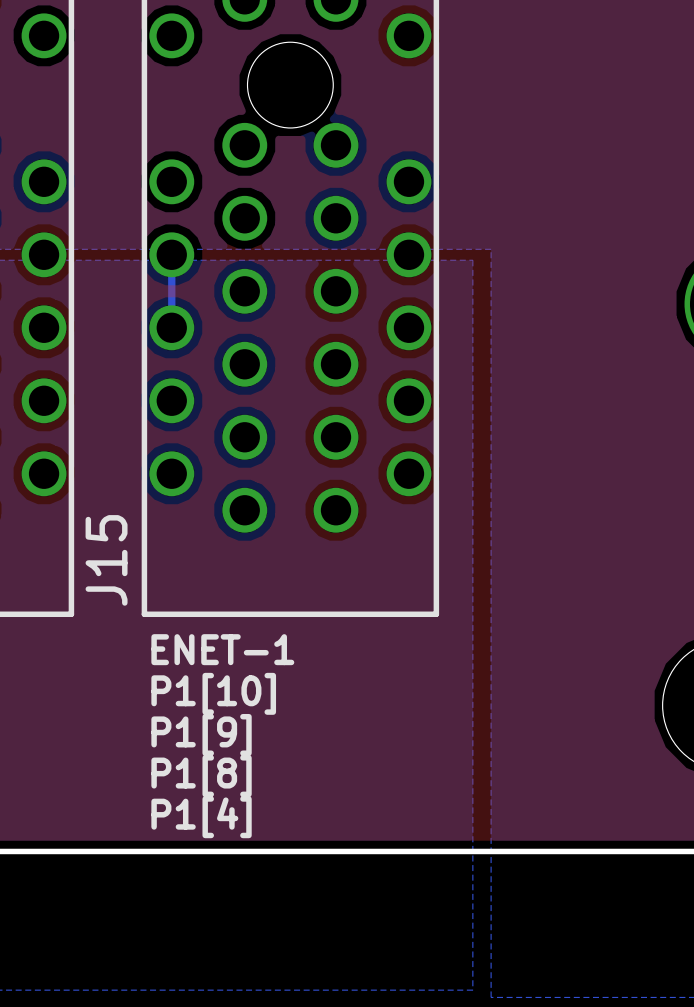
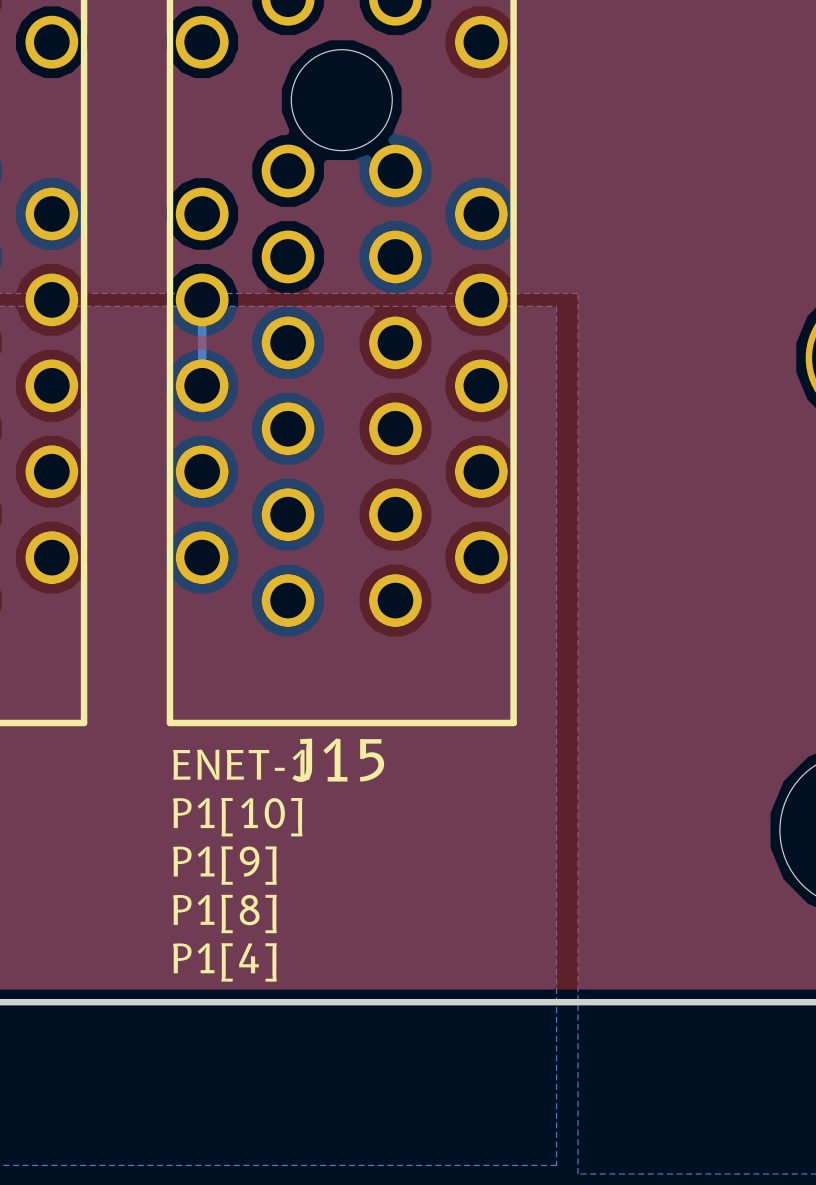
J15 name rotation: 0° (106, 560) -> 90° clockwise (338, 760)
J15 name position: J15 (106, 560) -> J15 (338, 760)

